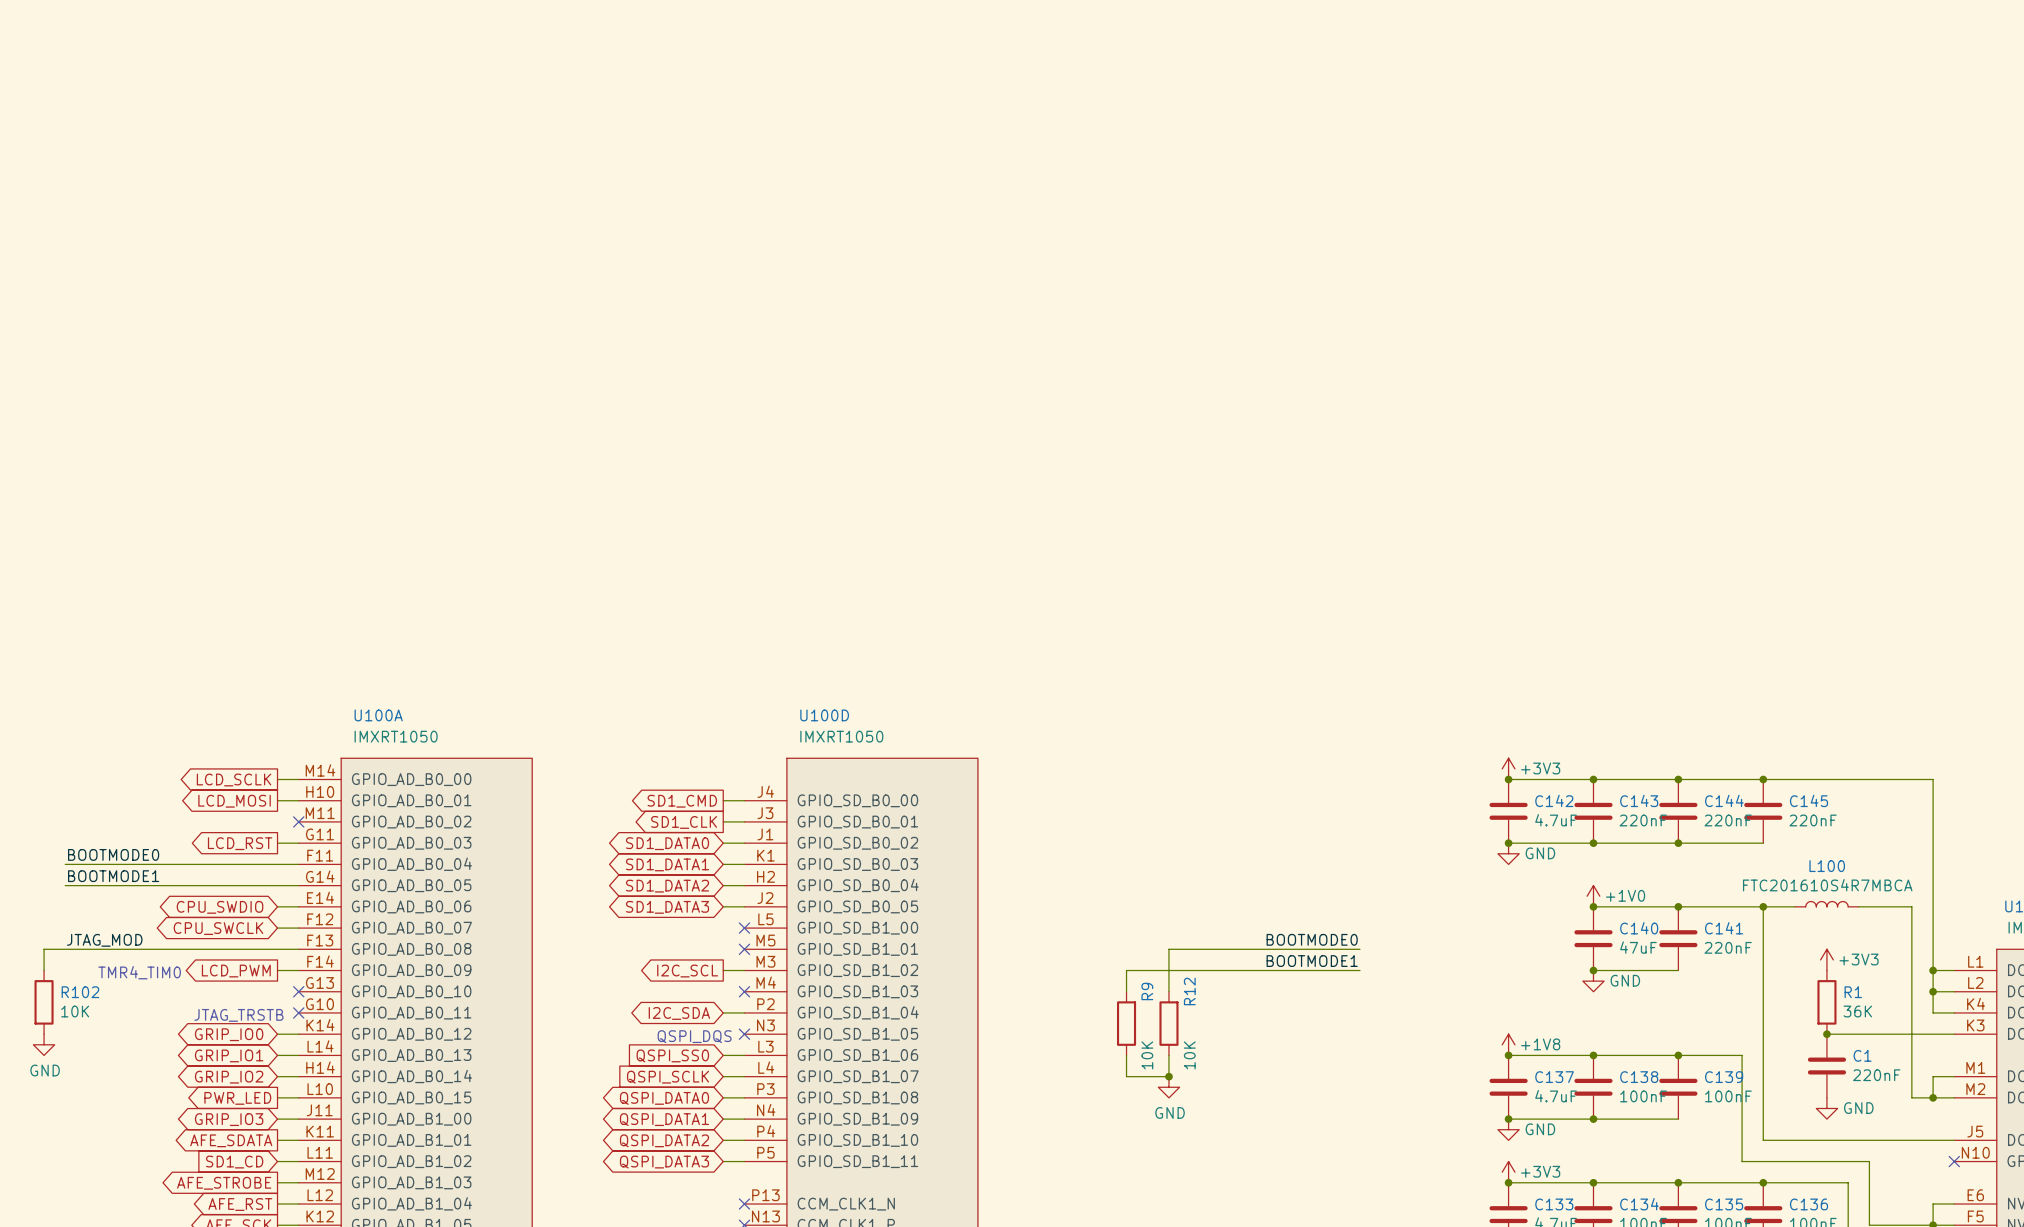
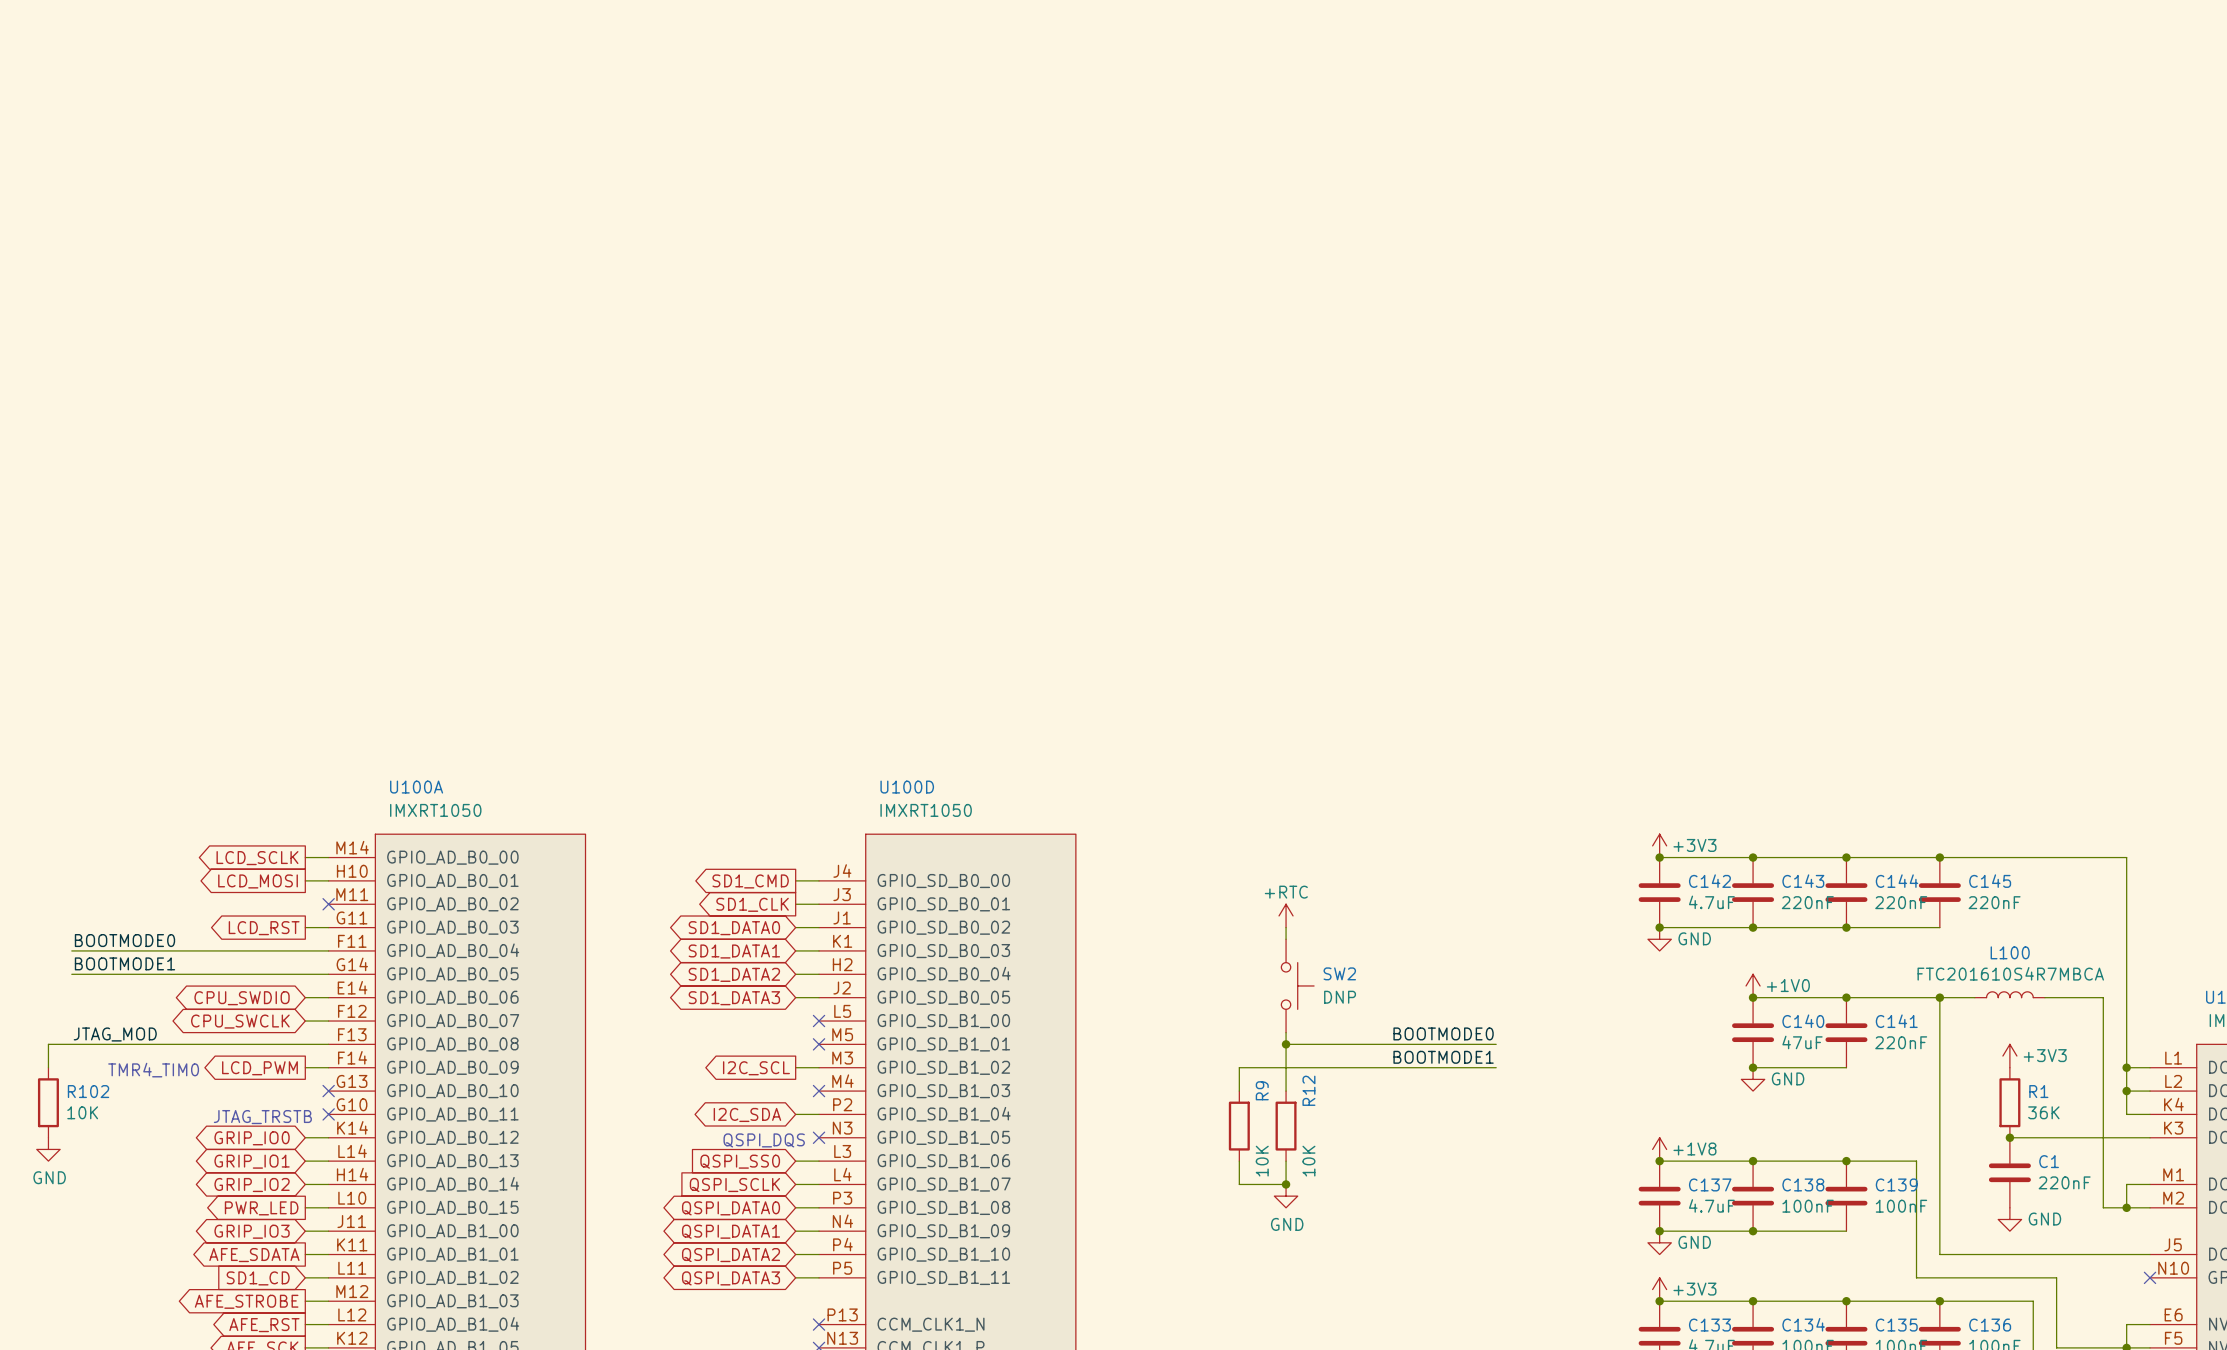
power symbol: none -> +RTC (1286, 915)
wire: none -> (1286, 927) (1286, 939)
SW2: none -> DNP (1297, 985)
wire: none -> (1286, 1032) (1286, 1044)
junction: none -> (1286, 1044)

